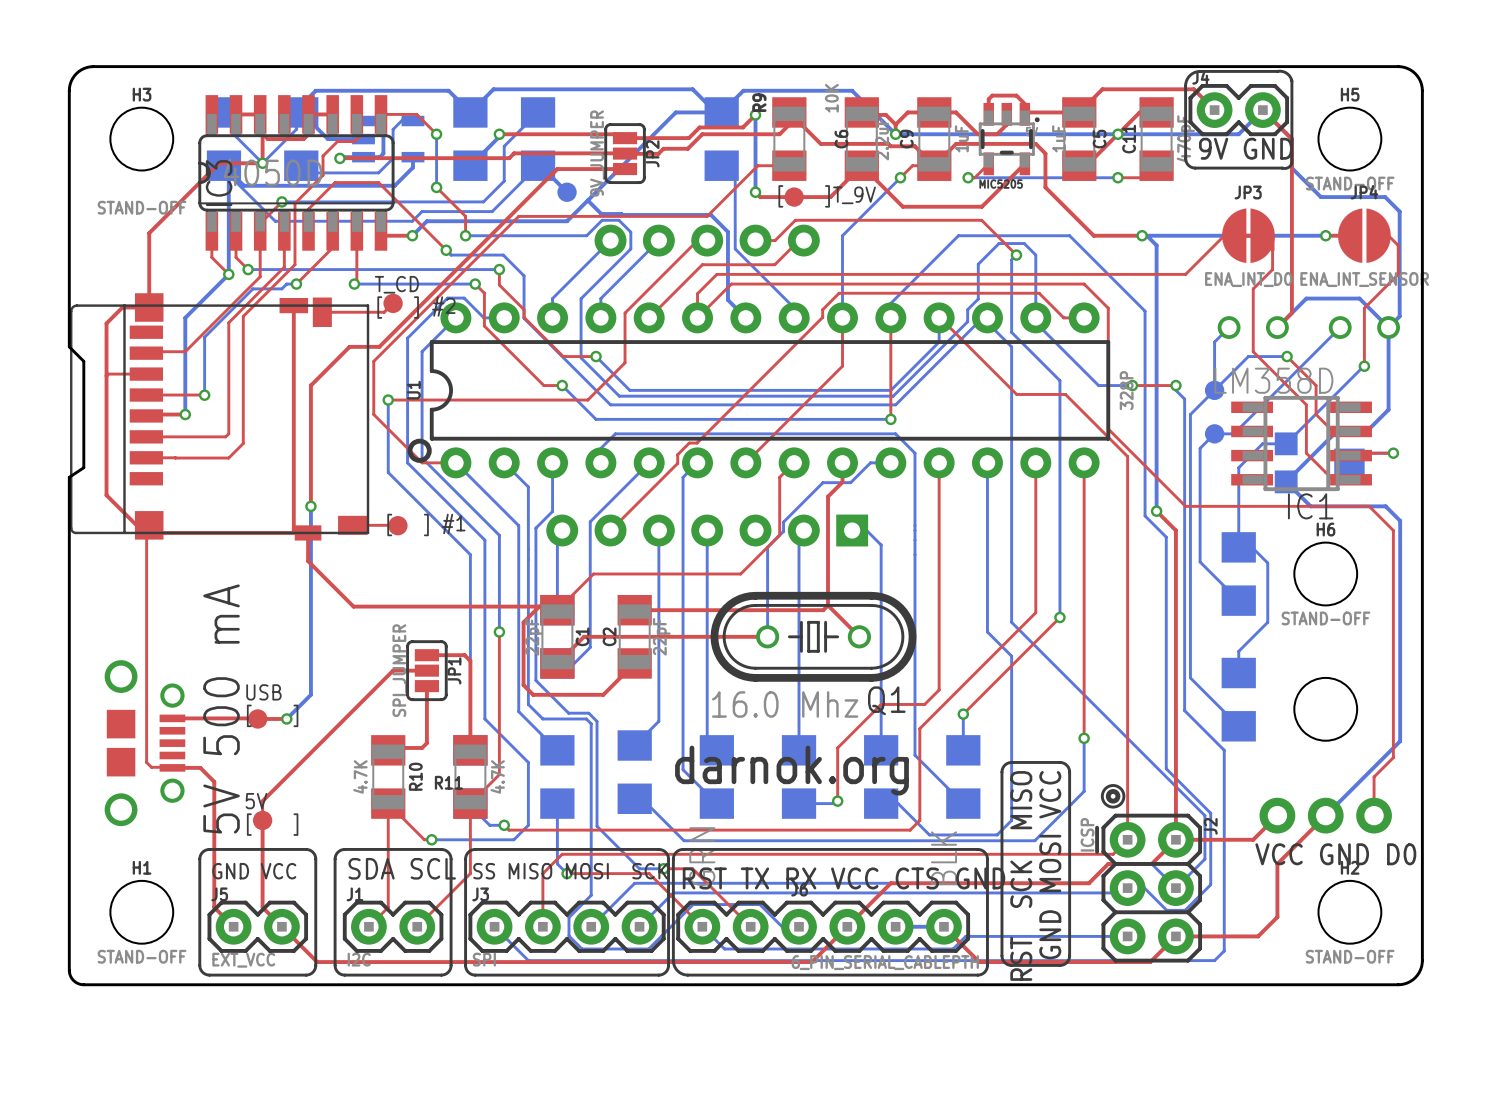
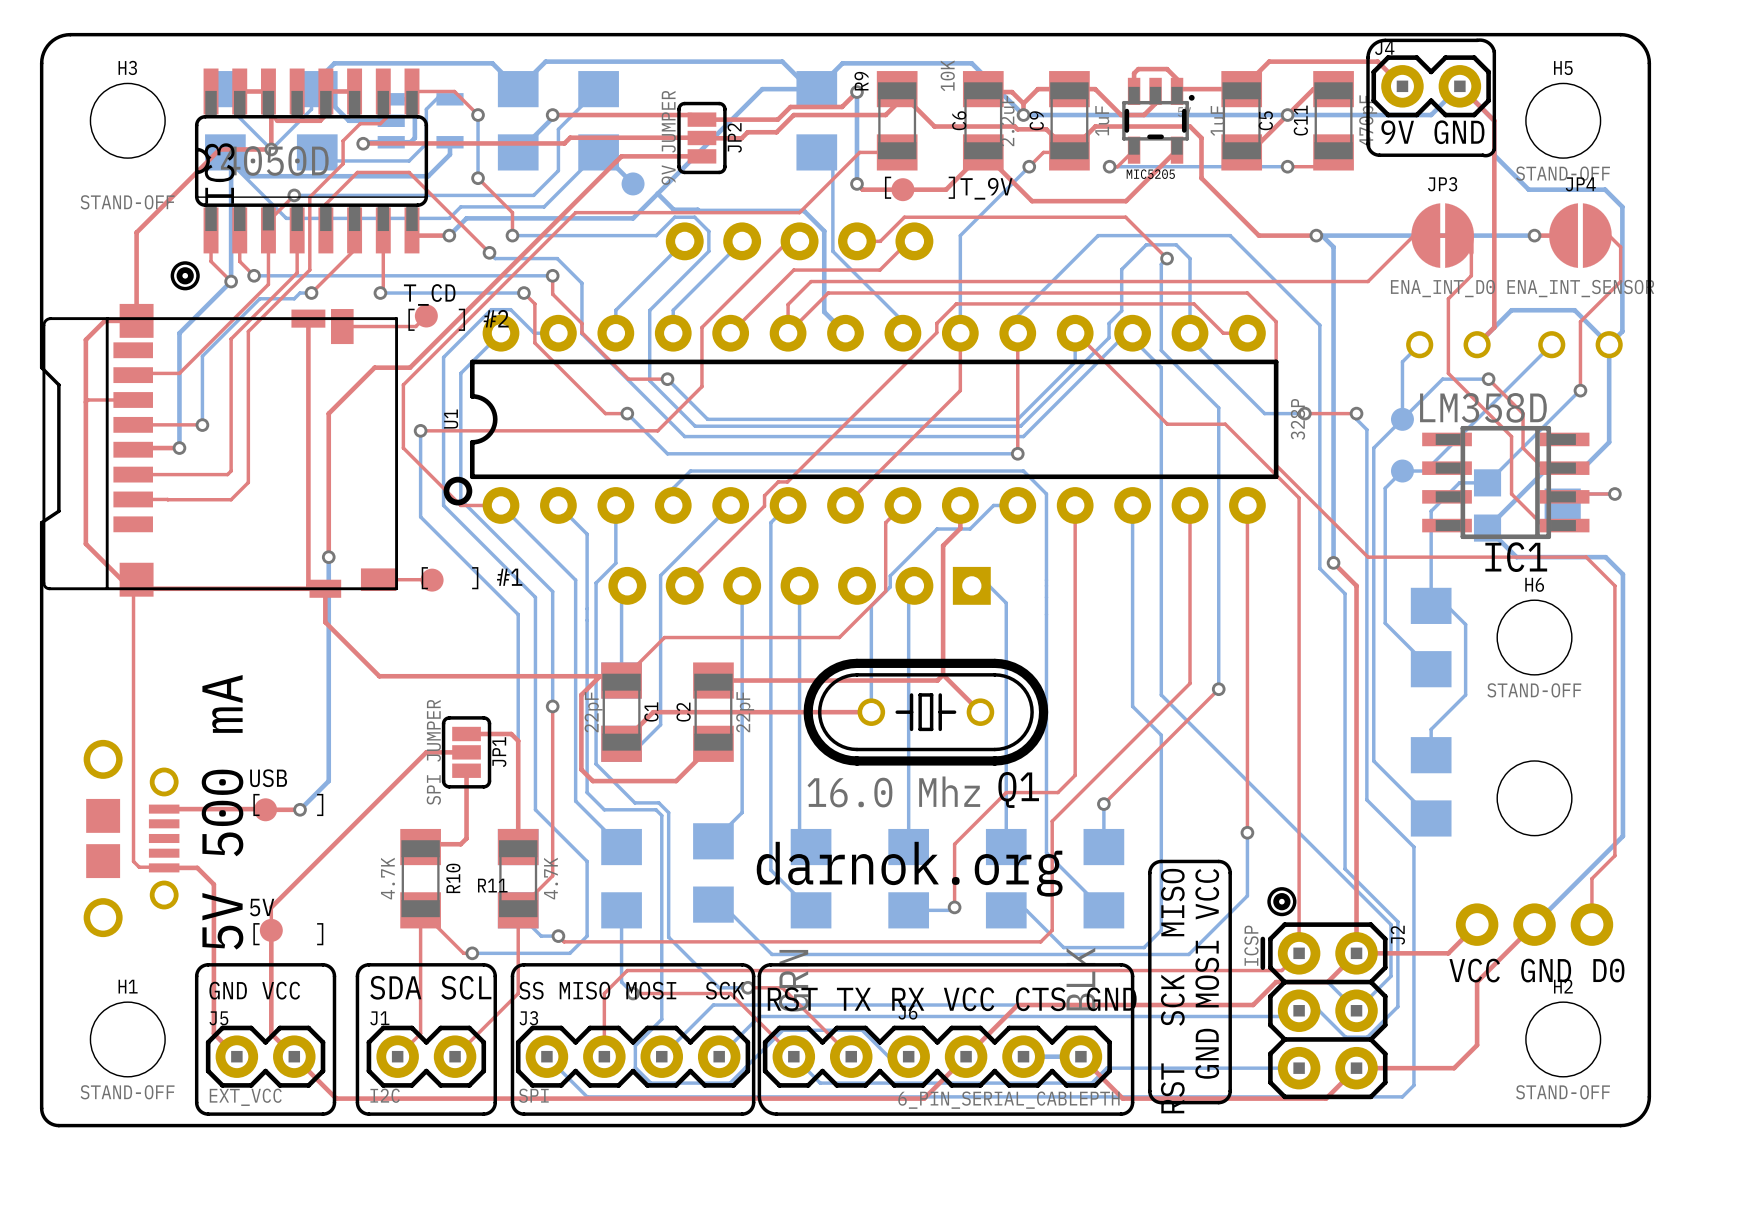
drawing: none -> [170, 261, 200, 291]

